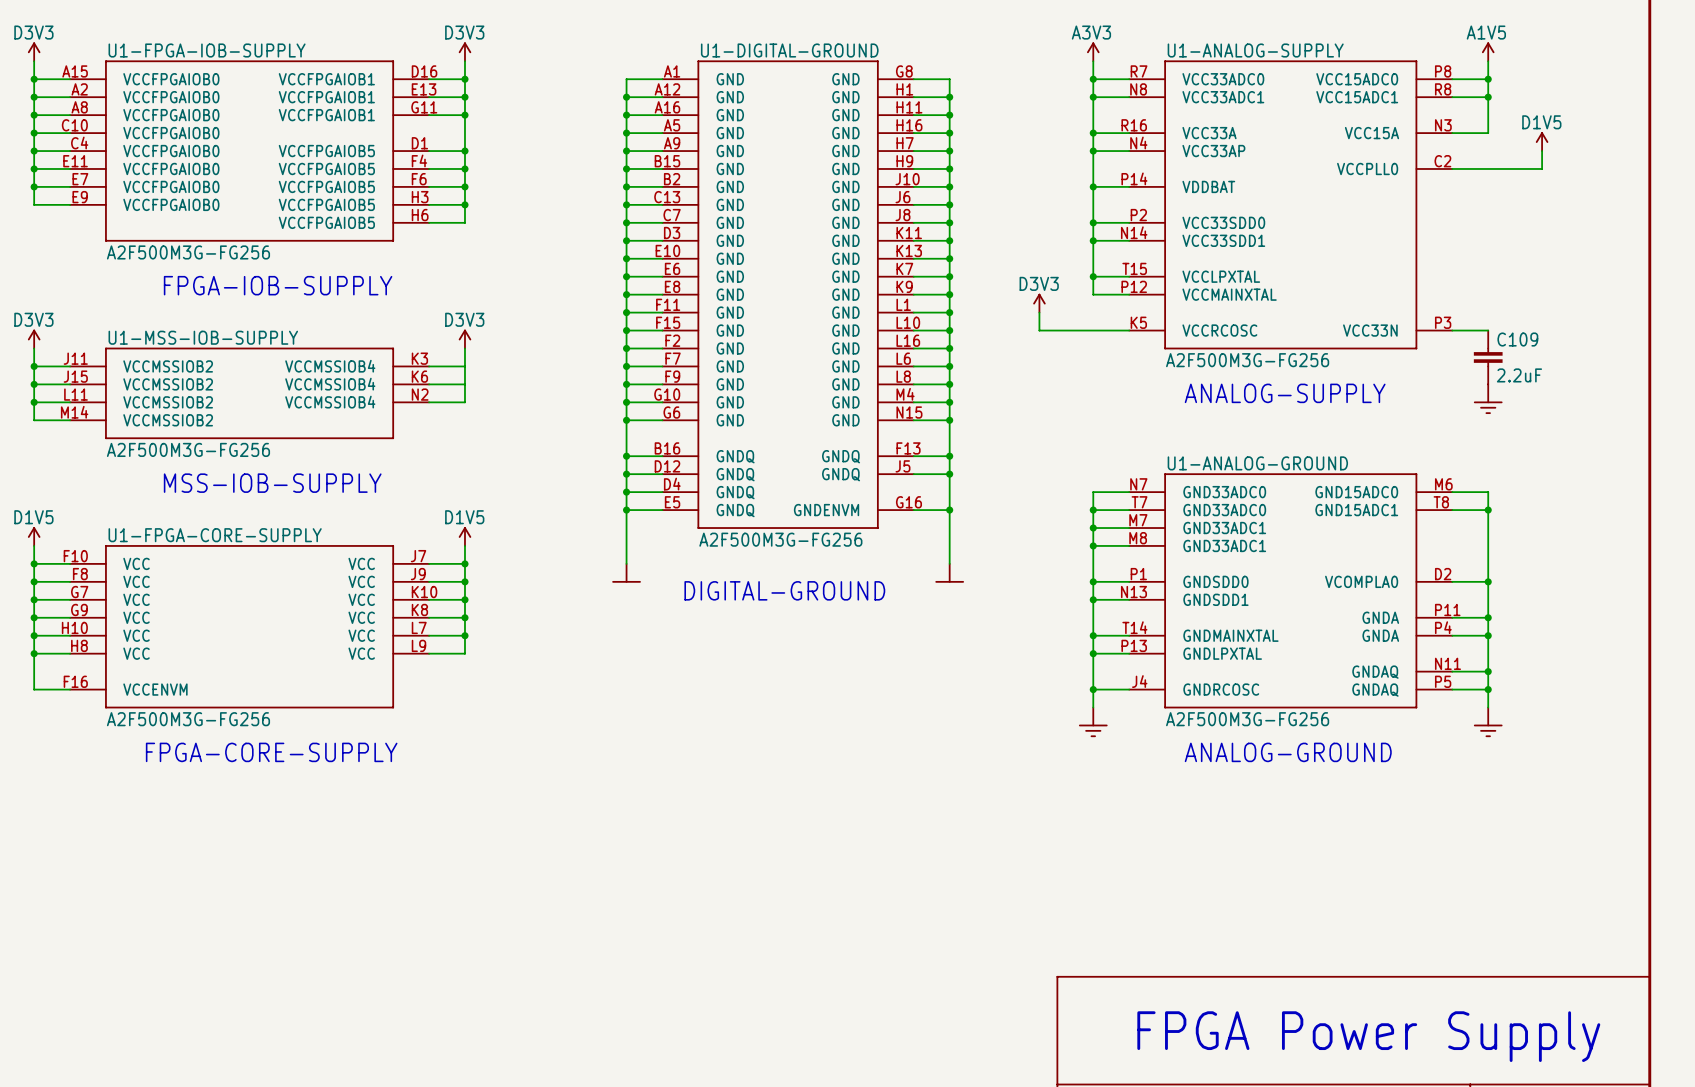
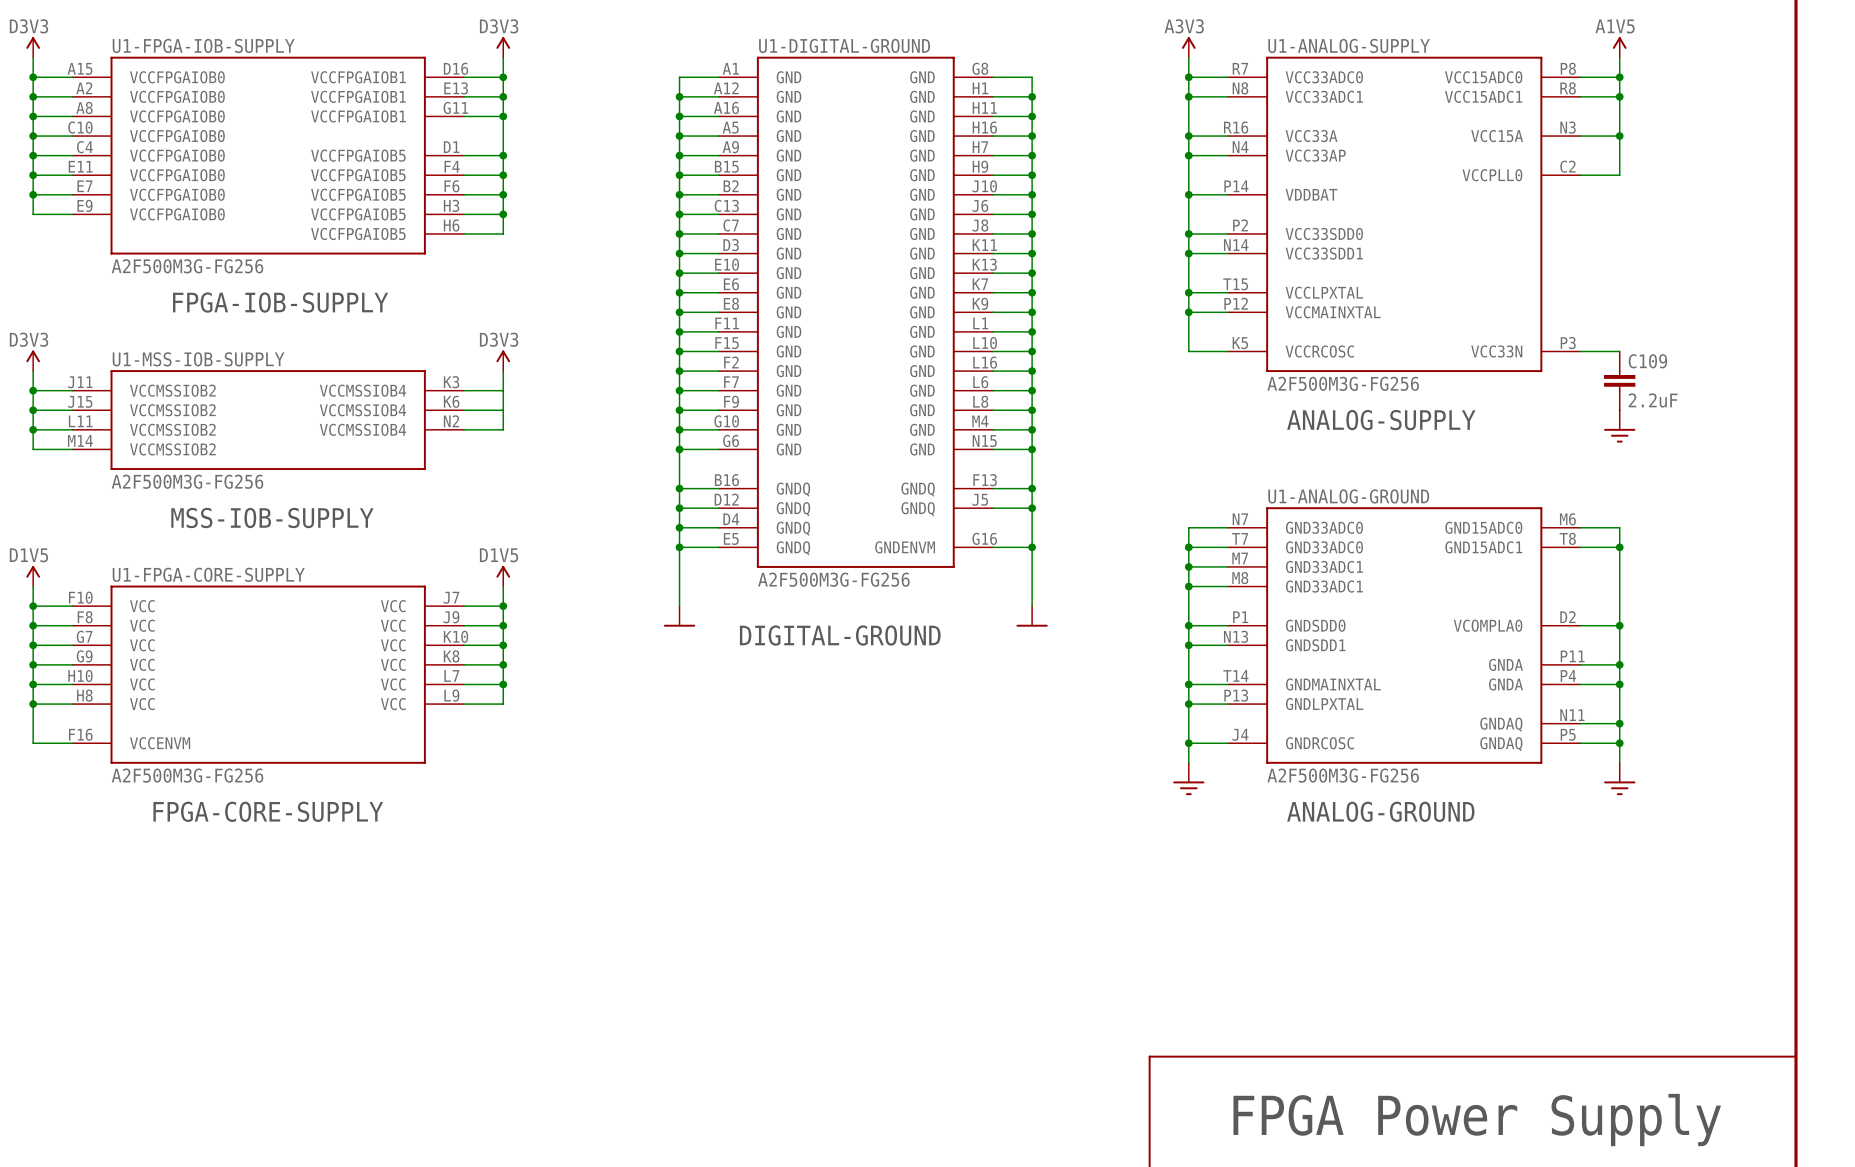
junction: none -> (1619, 136)
power symbol: D1V5 (1542, 141) -> none
wire: (1542, 151) (1542, 168) (1488, 168) -> (1619, 136) (1619, 175)
junction: none -> (1188, 312)
power symbol: D3V3 (1039, 303) -> none
wire: (1039, 312) (1039, 330) (1093, 330) -> (1188, 312) (1188, 351)

